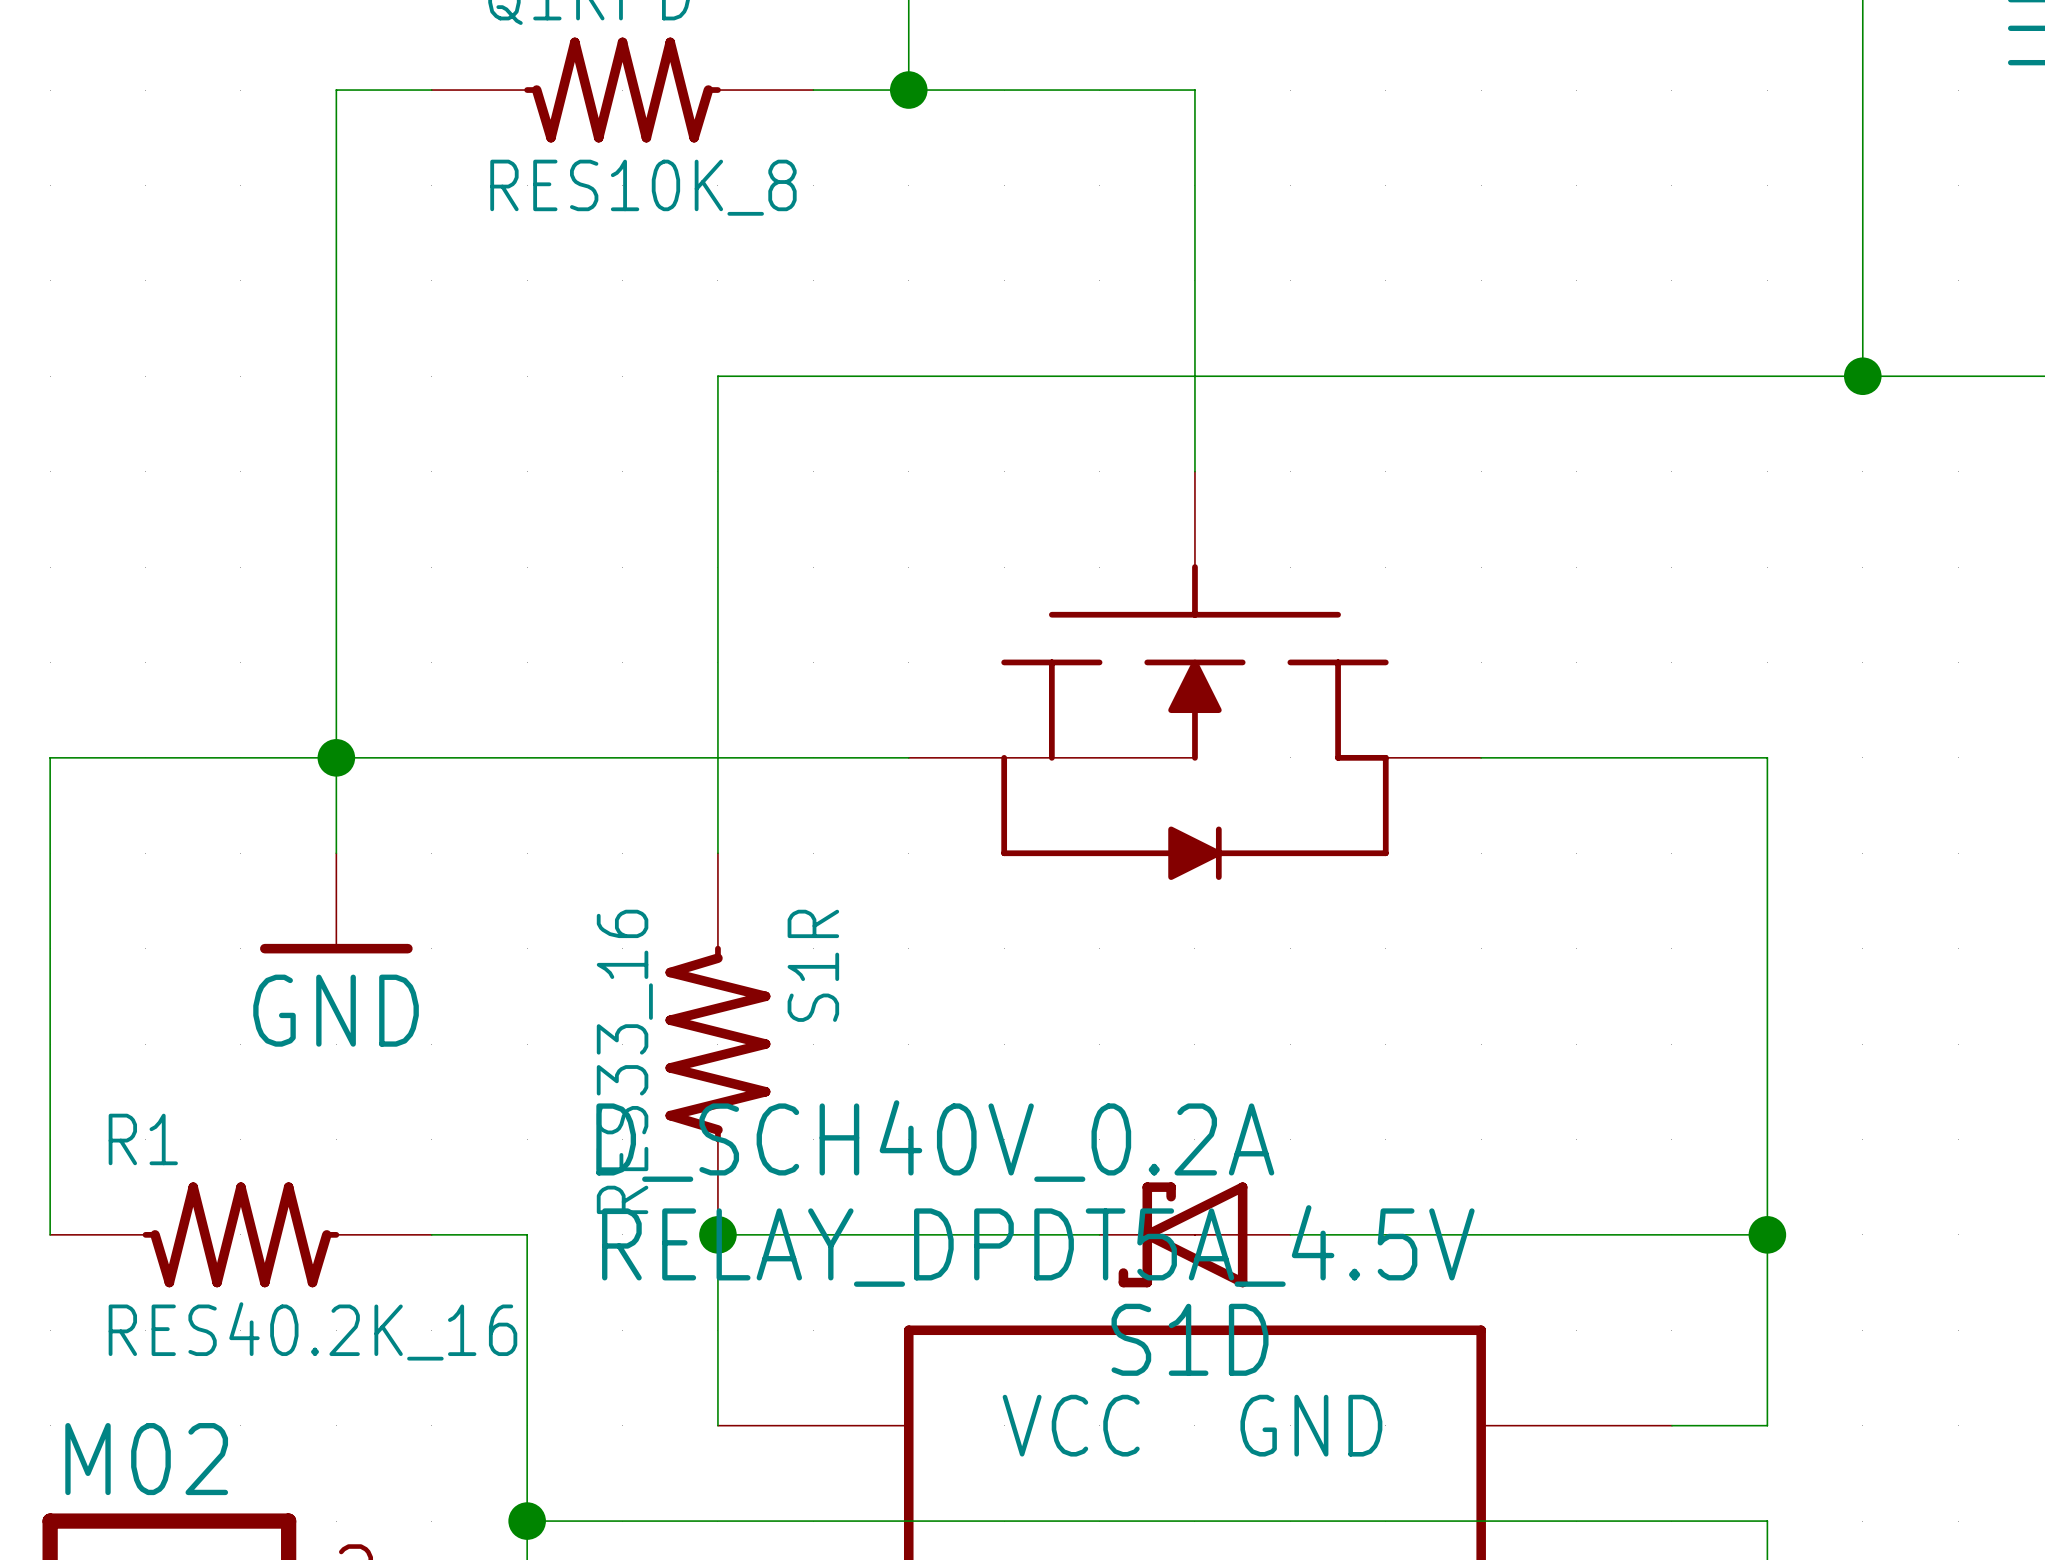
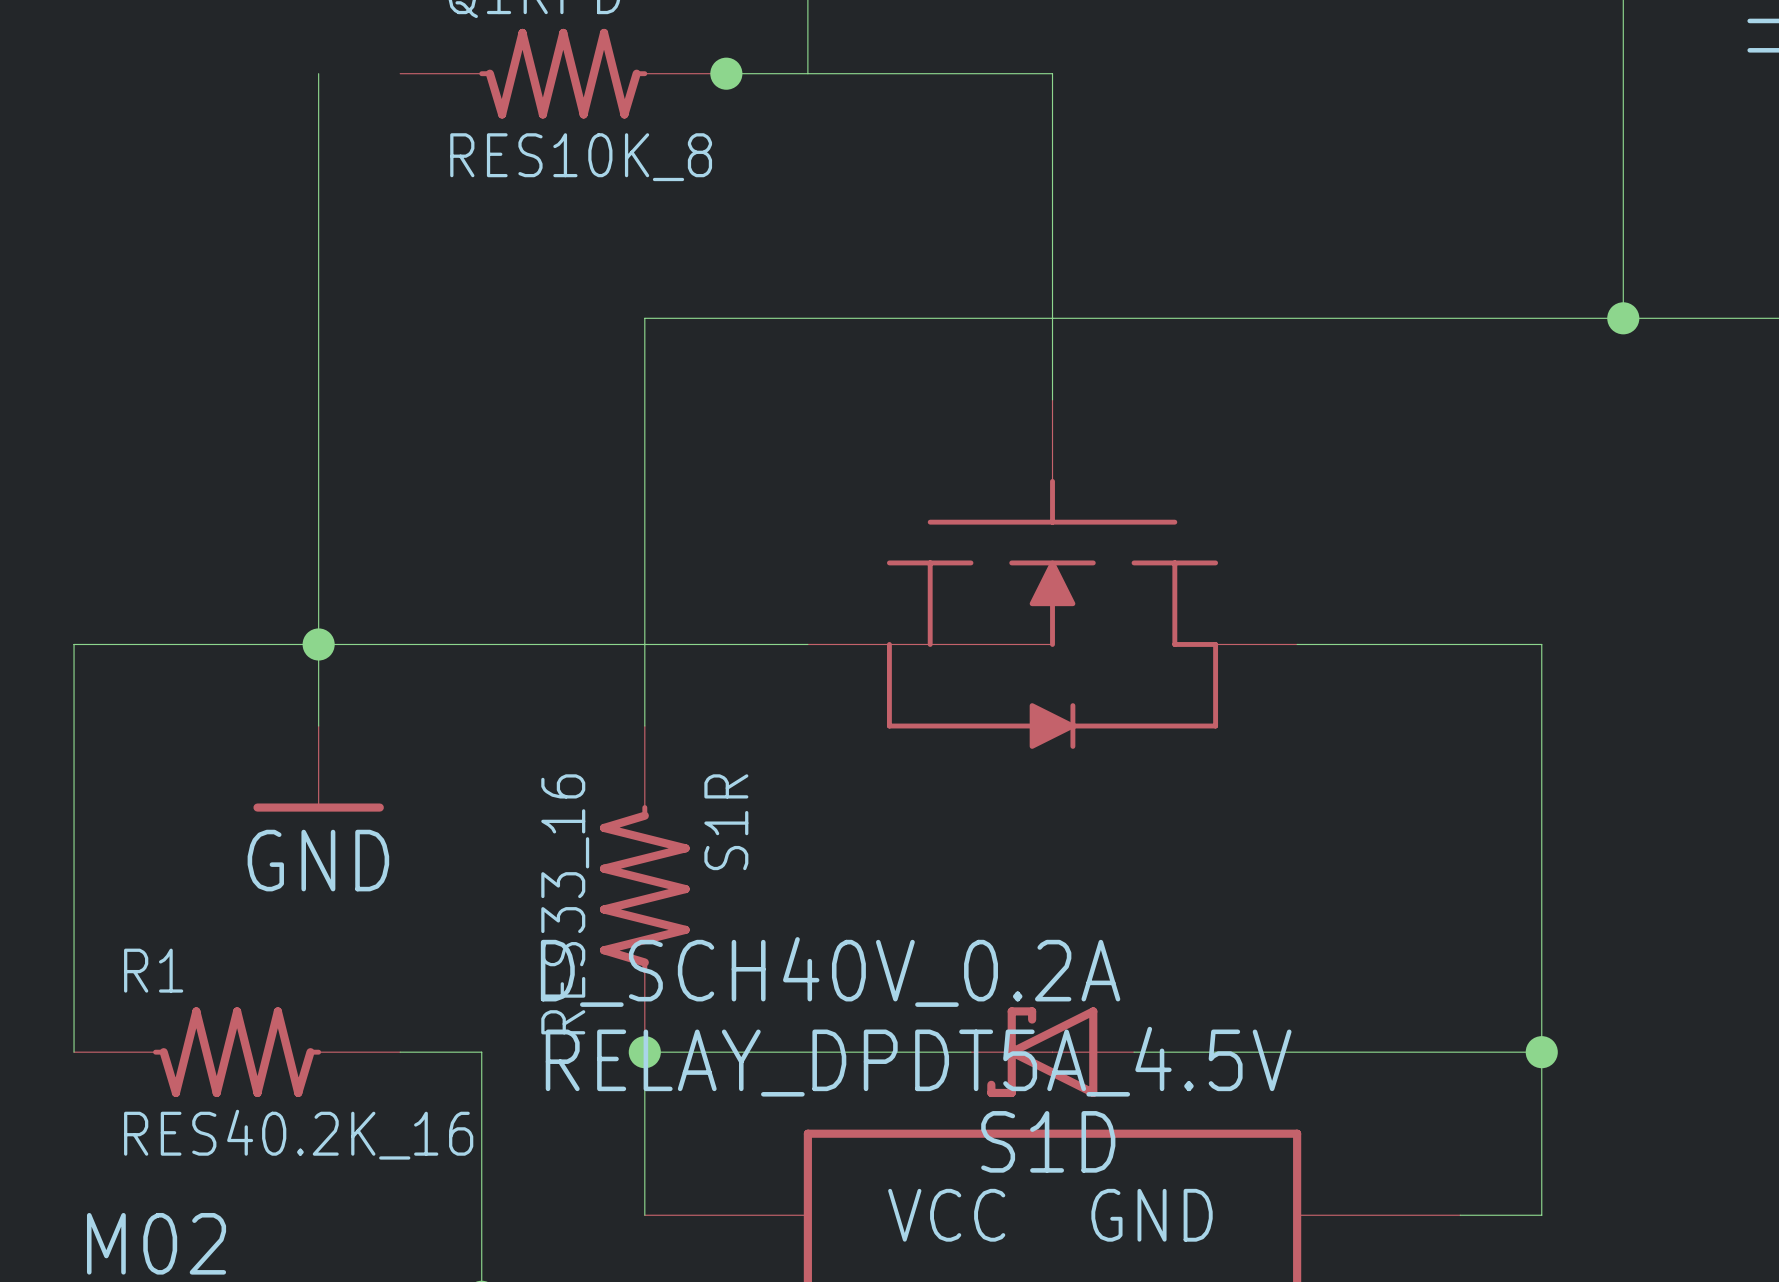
wire: (336, 90) (431, 90) -> none
junction position: (908, 90) -> (726, 73)

